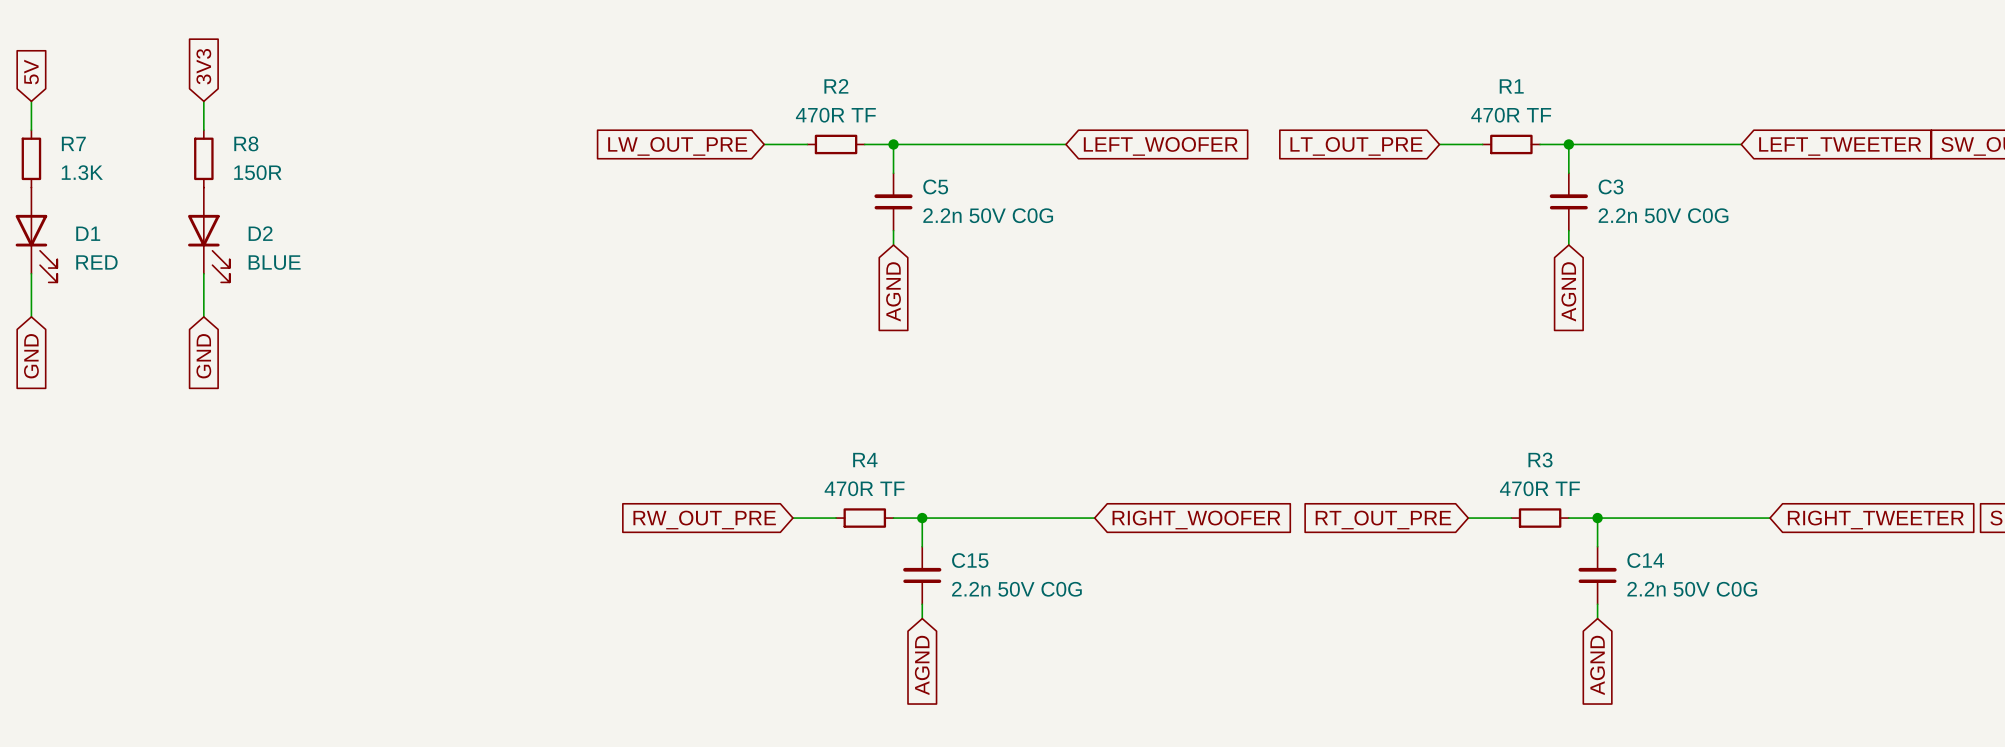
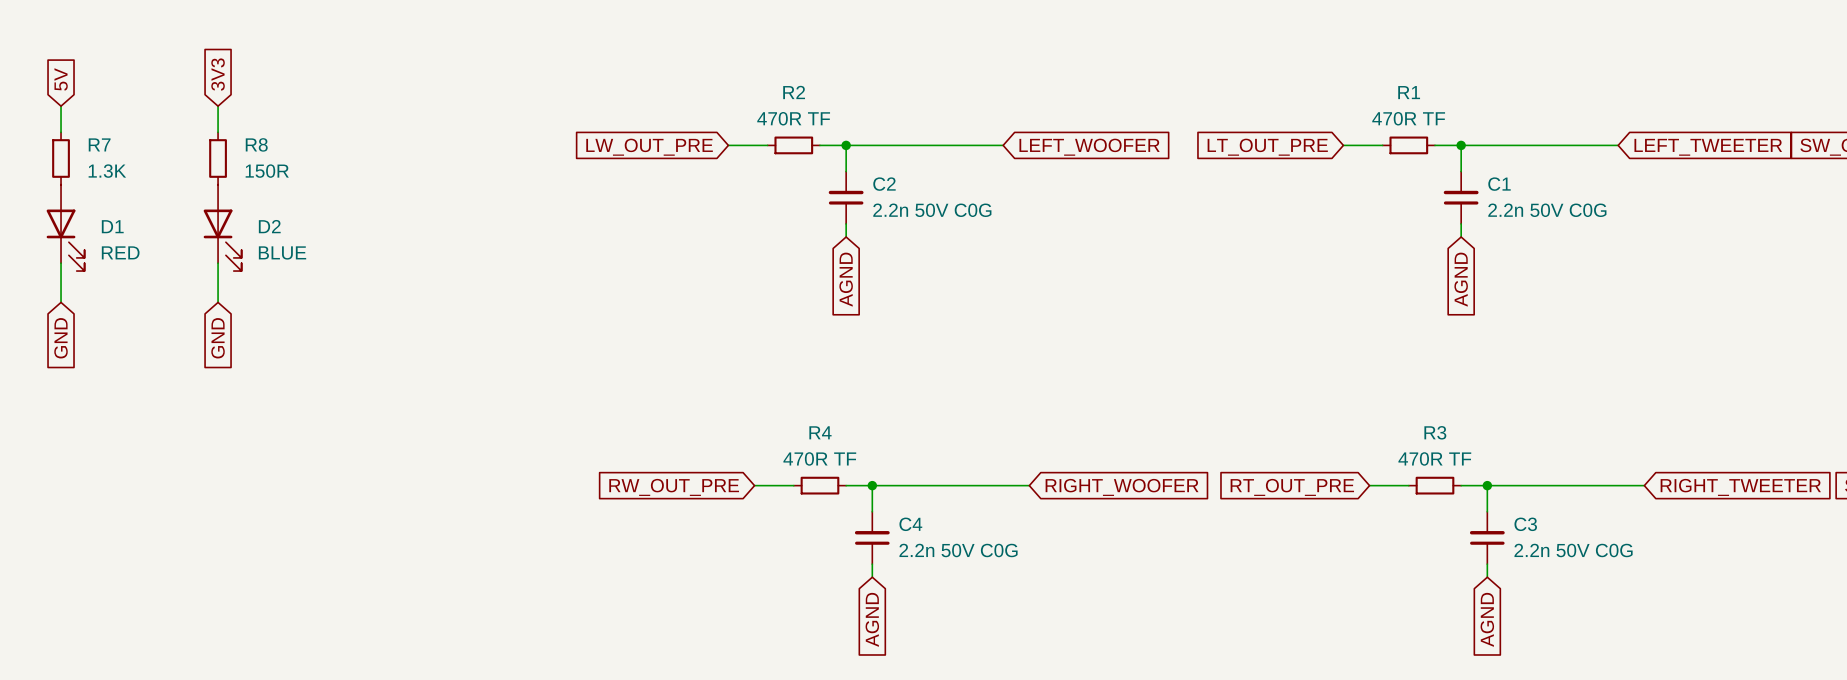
C5 name: C5 (935, 186) -> C2 (884, 184)
C3 name: C3 (1611, 186) -> C1 (1499, 184)
C15 name: C15 (970, 560) -> C4 (910, 524)
C14 name: C14 (1645, 560) -> C3 (1525, 524)

